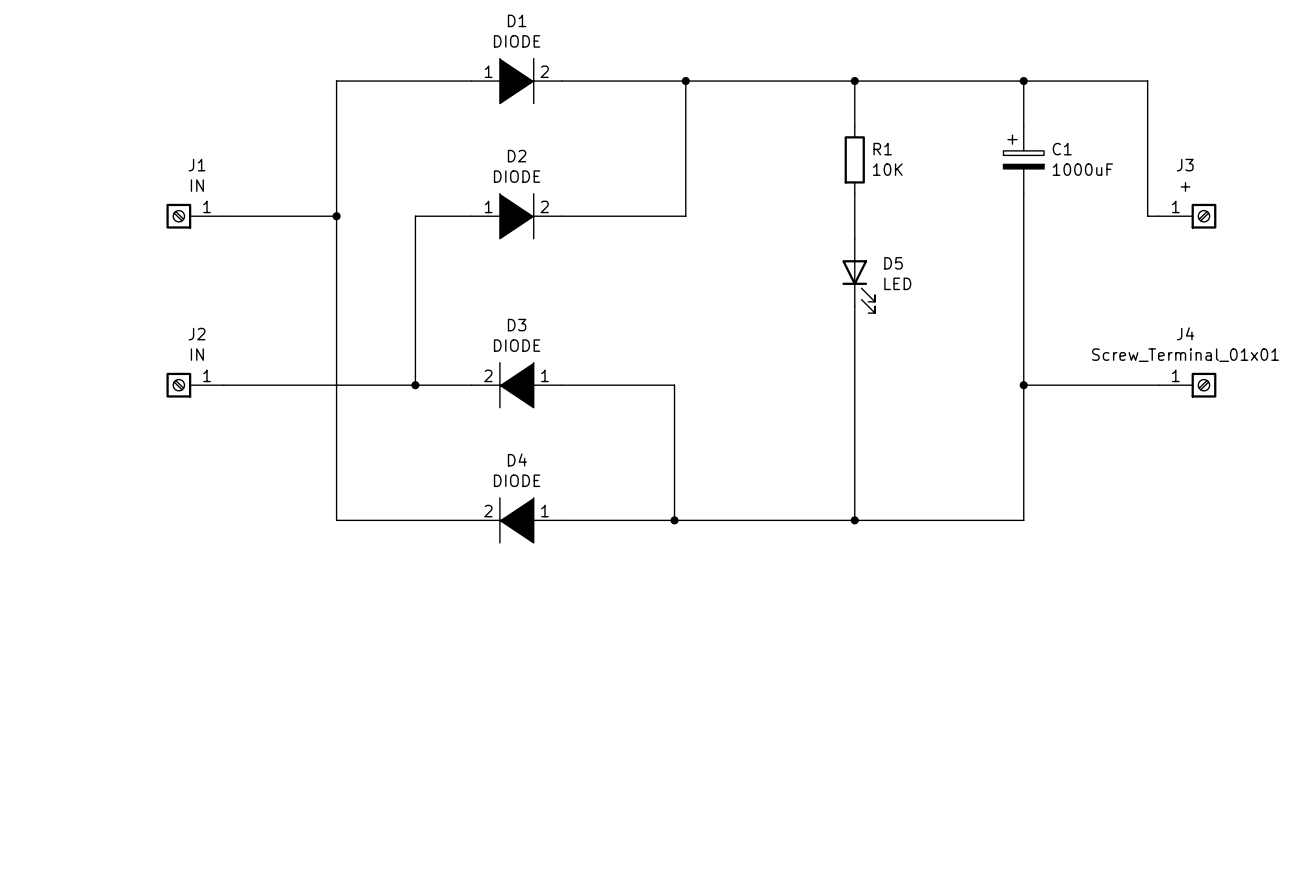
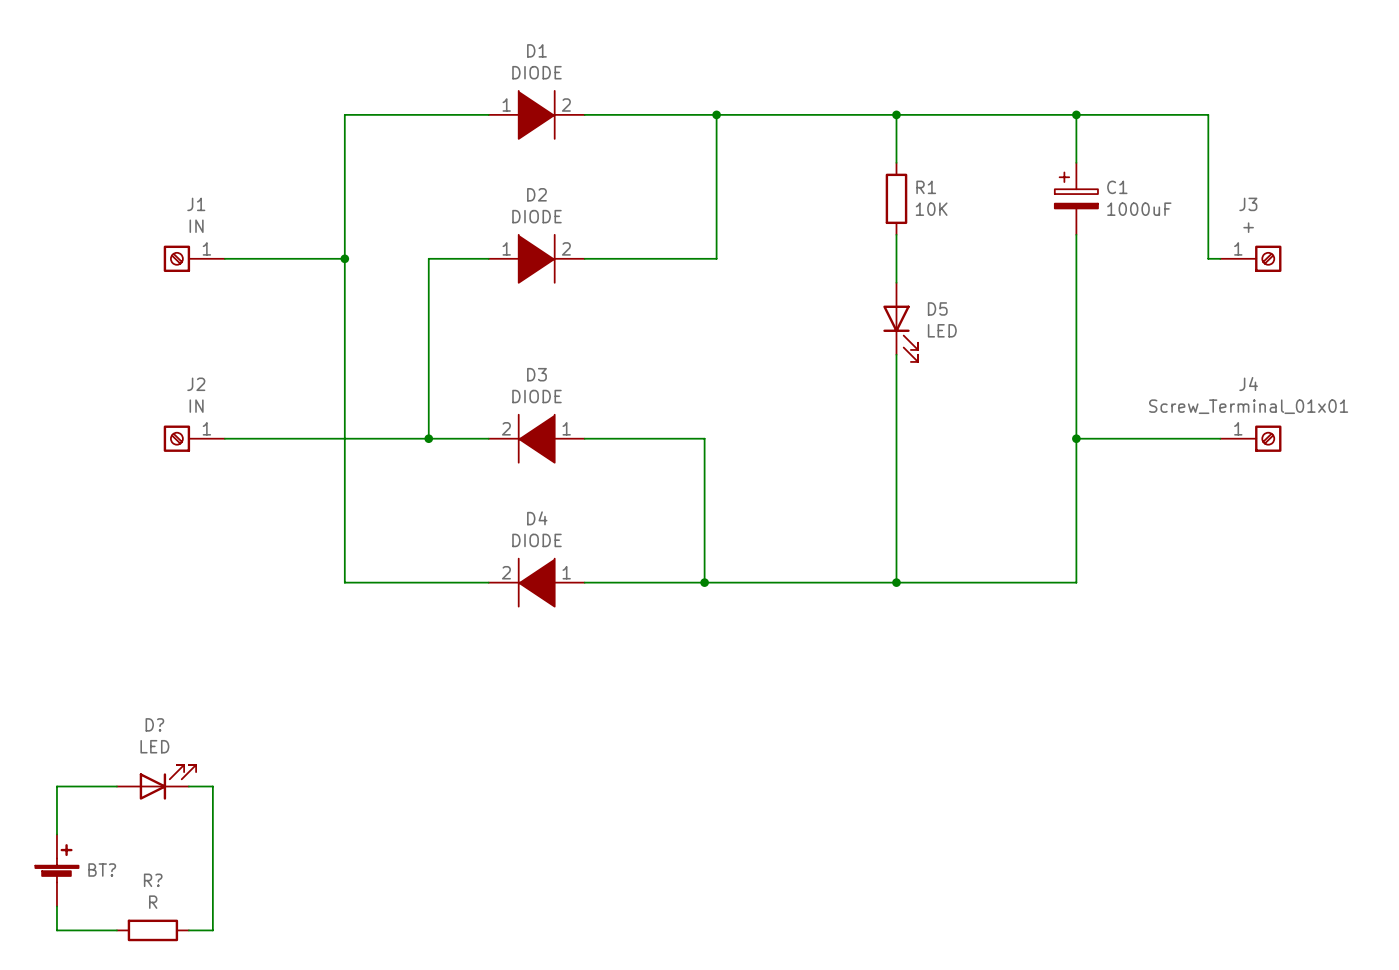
D?: none -> LED (156, 782)
wire: none -> (116, 786) (56, 786) (56, 834)
wire: none -> (188, 786) (212, 786) (212, 930) (188, 930)
BT?: none -> (56, 870)
wire: none -> (56, 906) (56, 930) (116, 930)
R?: none -> R (152, 930)

